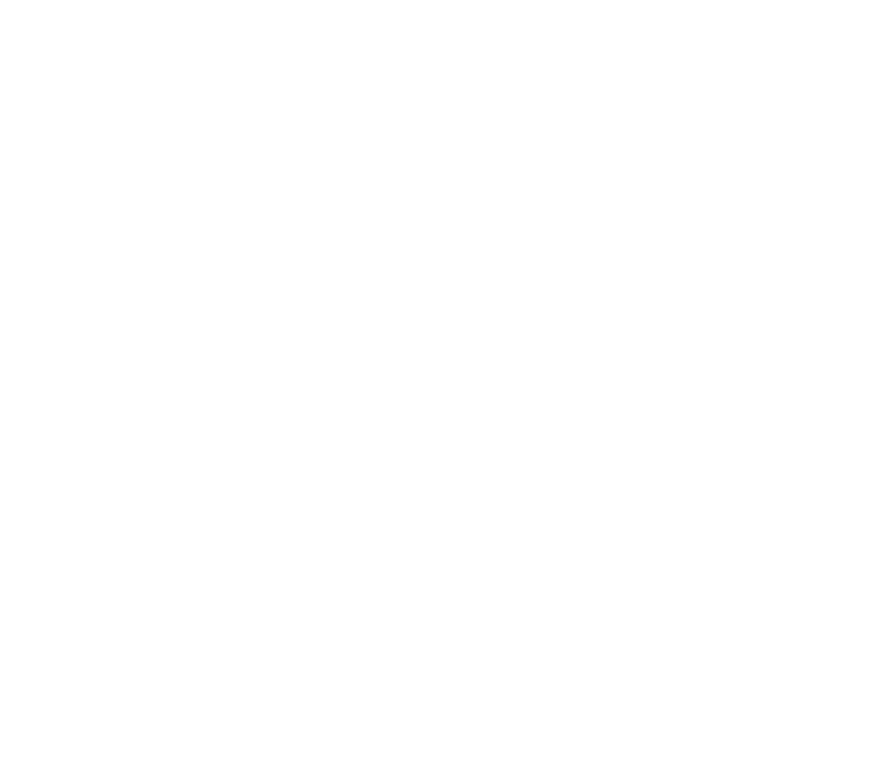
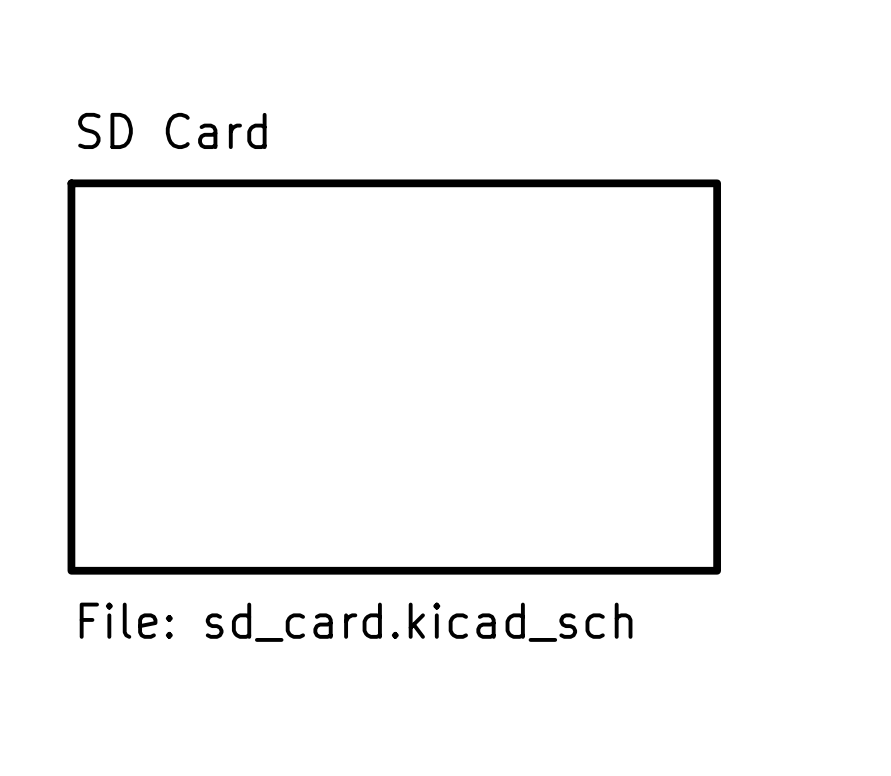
sheet SD Card: none -> File: sd_card.kicad_sch (394, 377)

